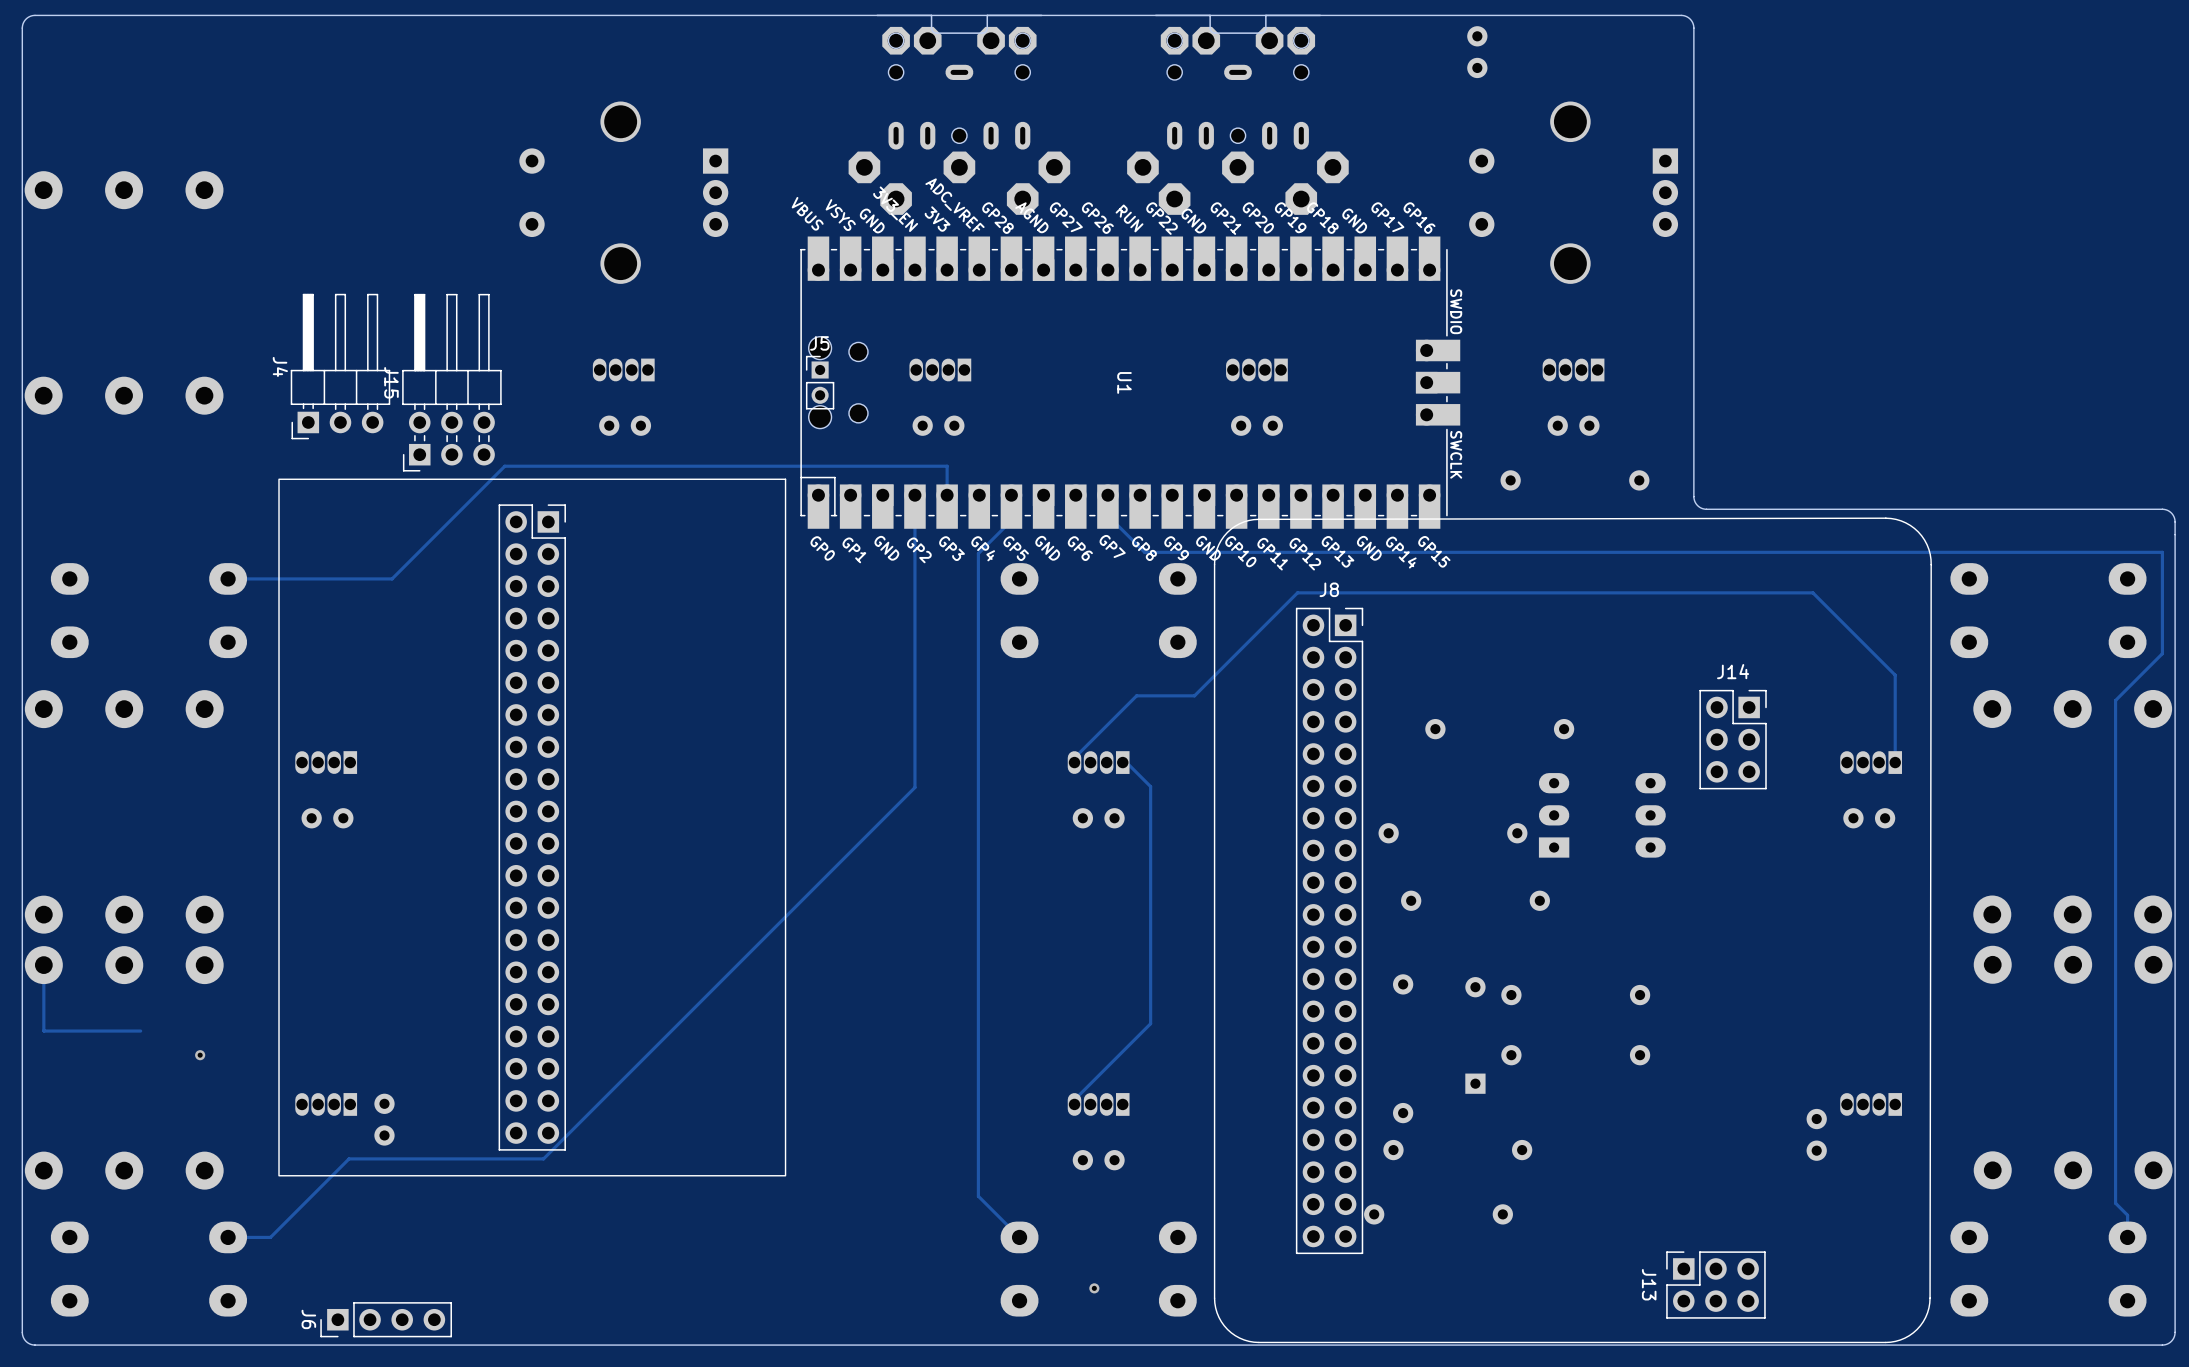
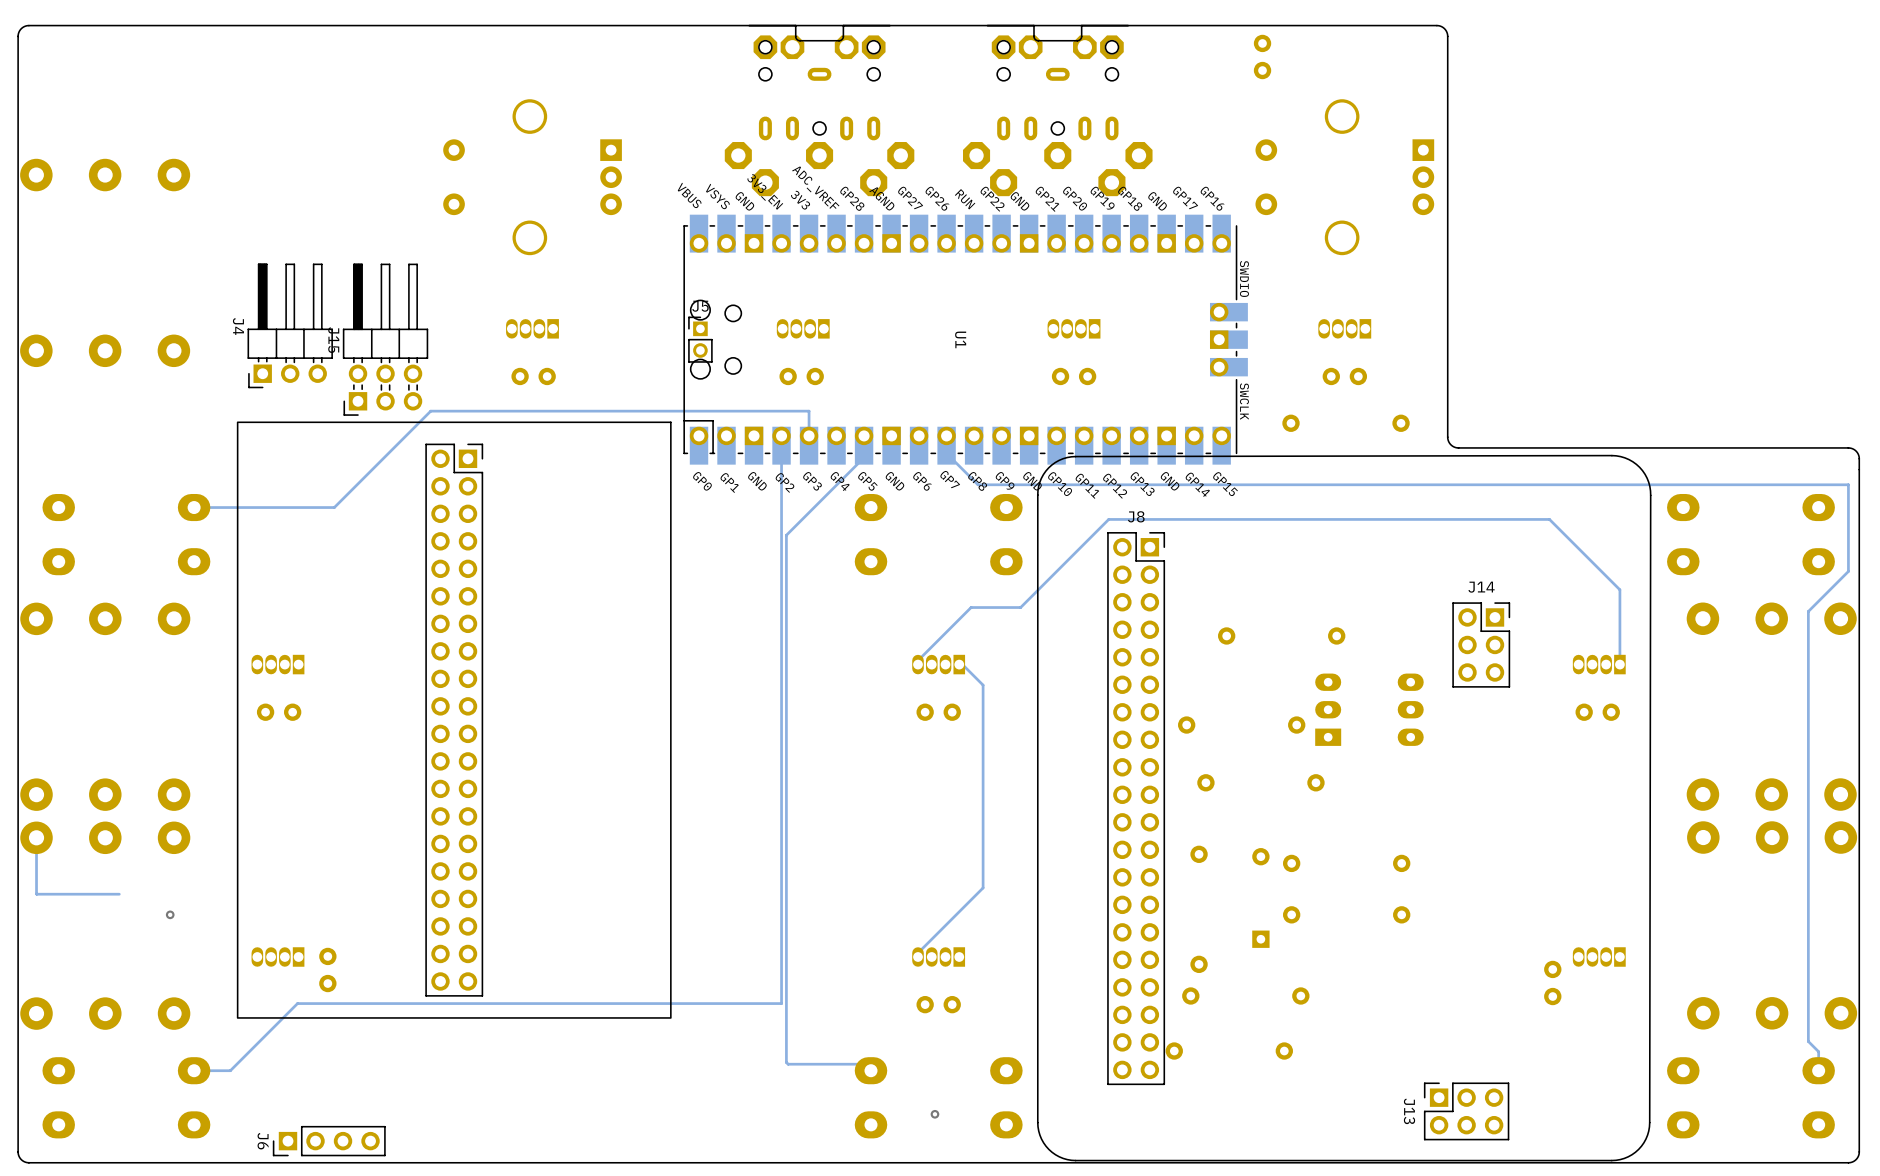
track: (978, 553) (978, 1196) (1011, 1229) -> (835, 485) (786, 535) (786, 1062) (788, 1064) (864, 1064)
track: (914, 787) (543, 1158) -> (781, 685) (781, 1003) (463, 1003)

